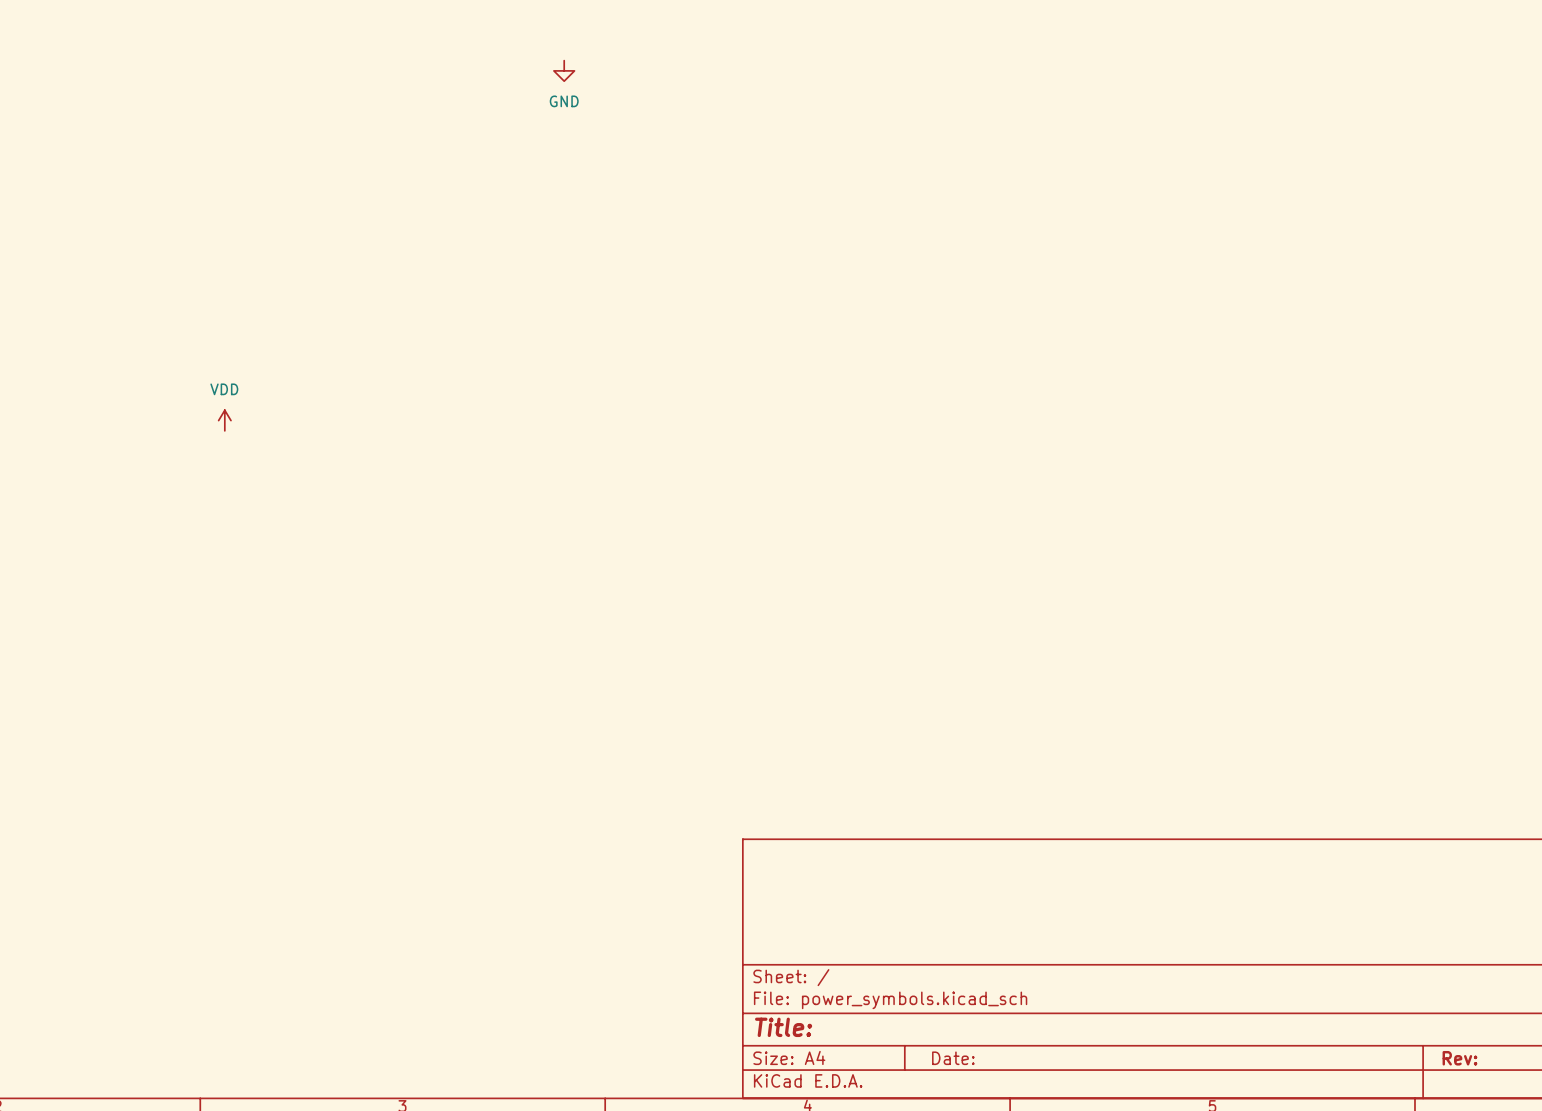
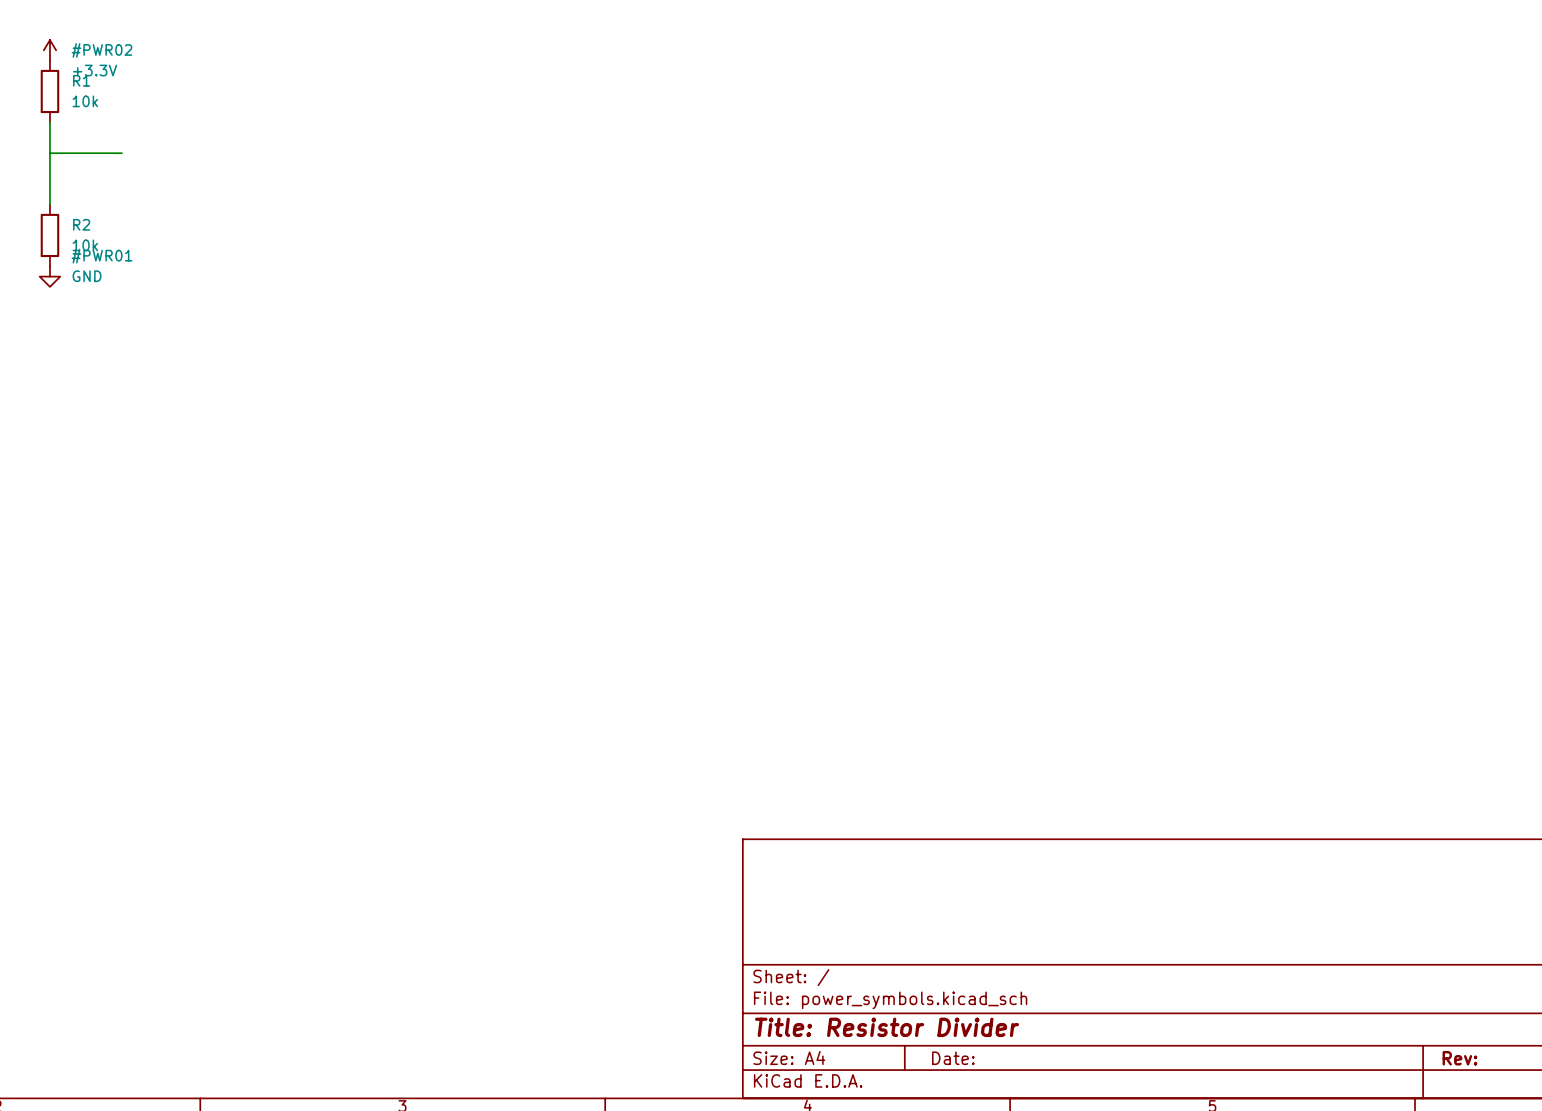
#PWR02: none -> +3.3V (49, 50)
power symbol: GND (564, 70) -> none
R1: none -> 10k (49, 91)
wire: none -> (49, 122) (49, 204)
wire: none -> (49, 153) (121, 153)
R2: none -> 10k (49, 235)
#PWR01: none -> GND (49, 276)
power symbol: VDD (224, 420) -> none
title block: Title: (783, 1027) -> Title: Resistor Divider (887, 1027)

